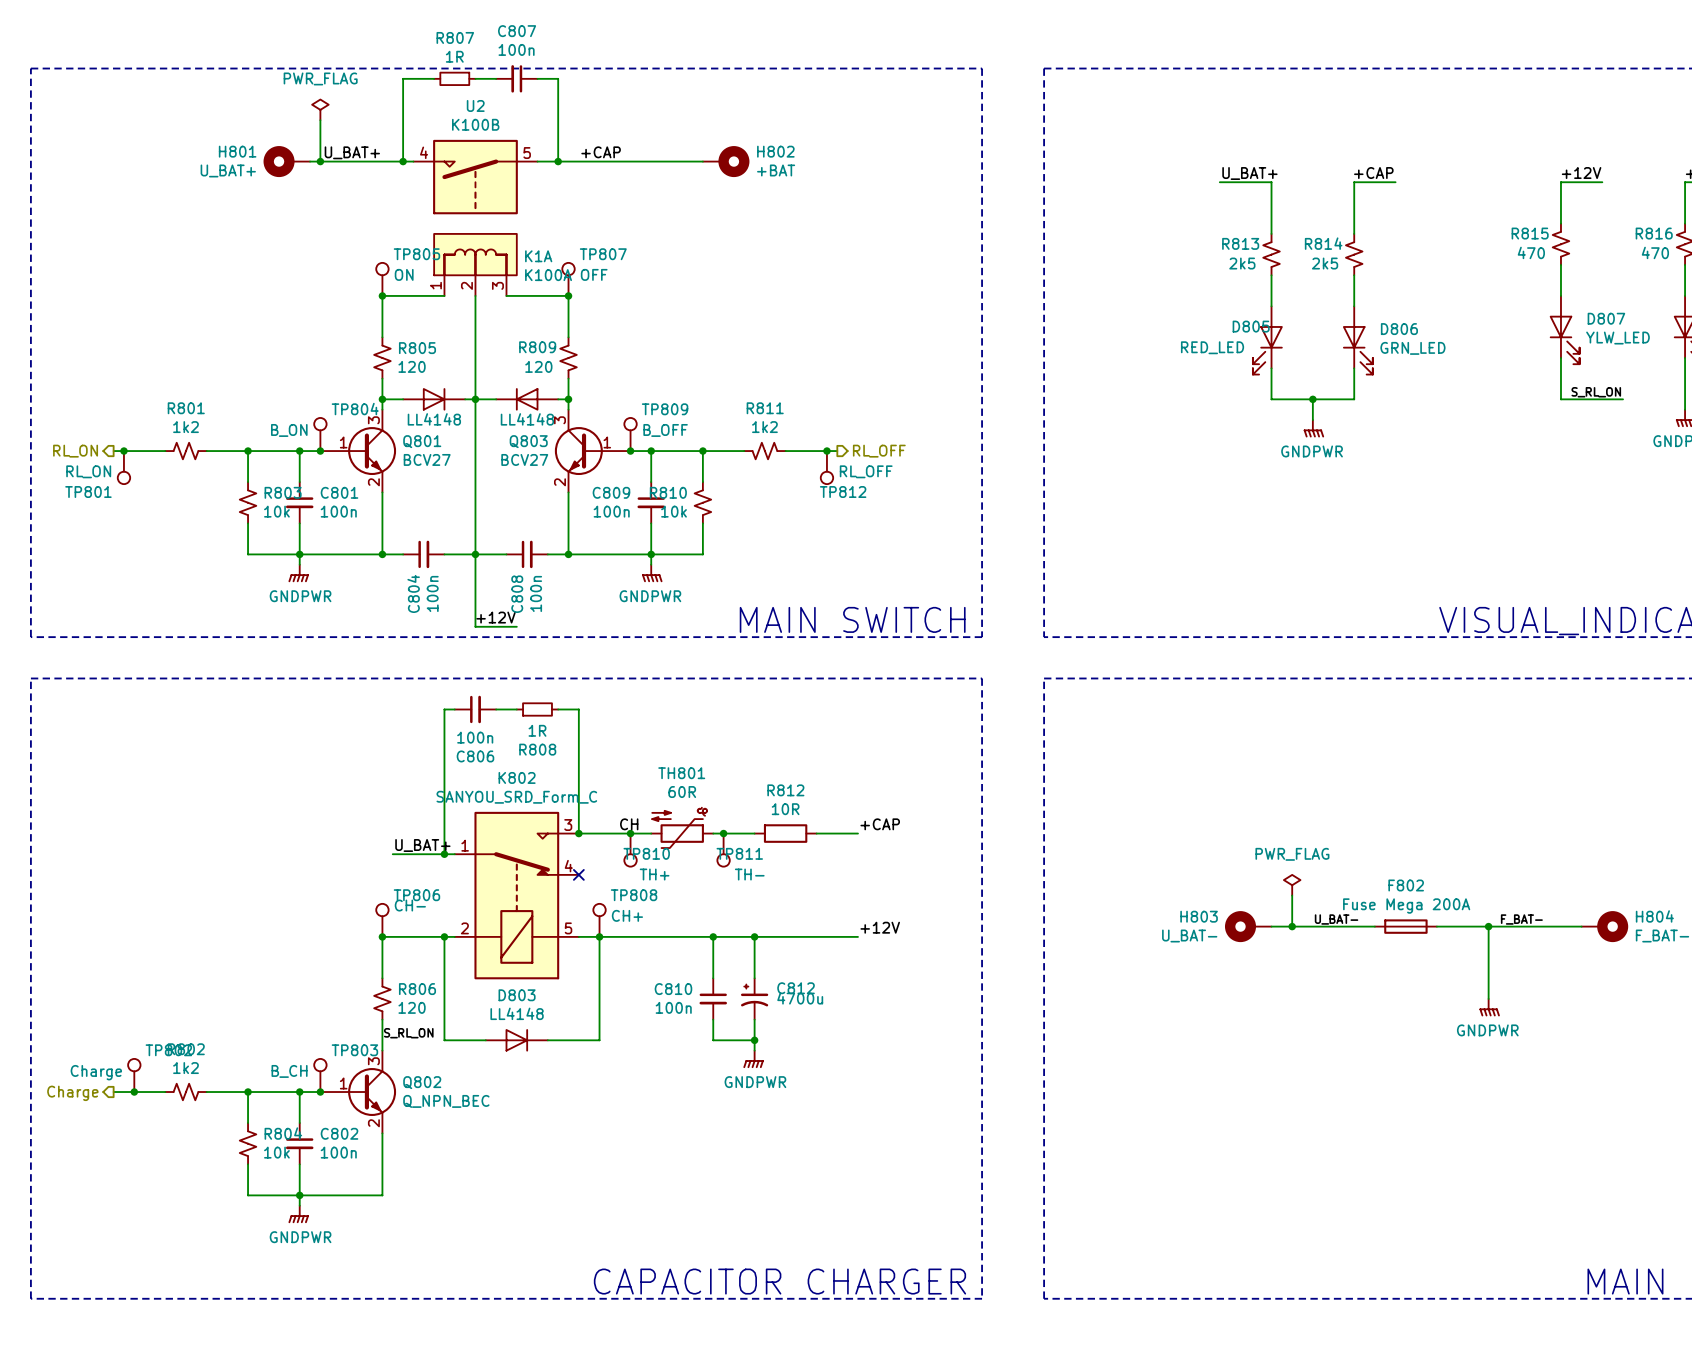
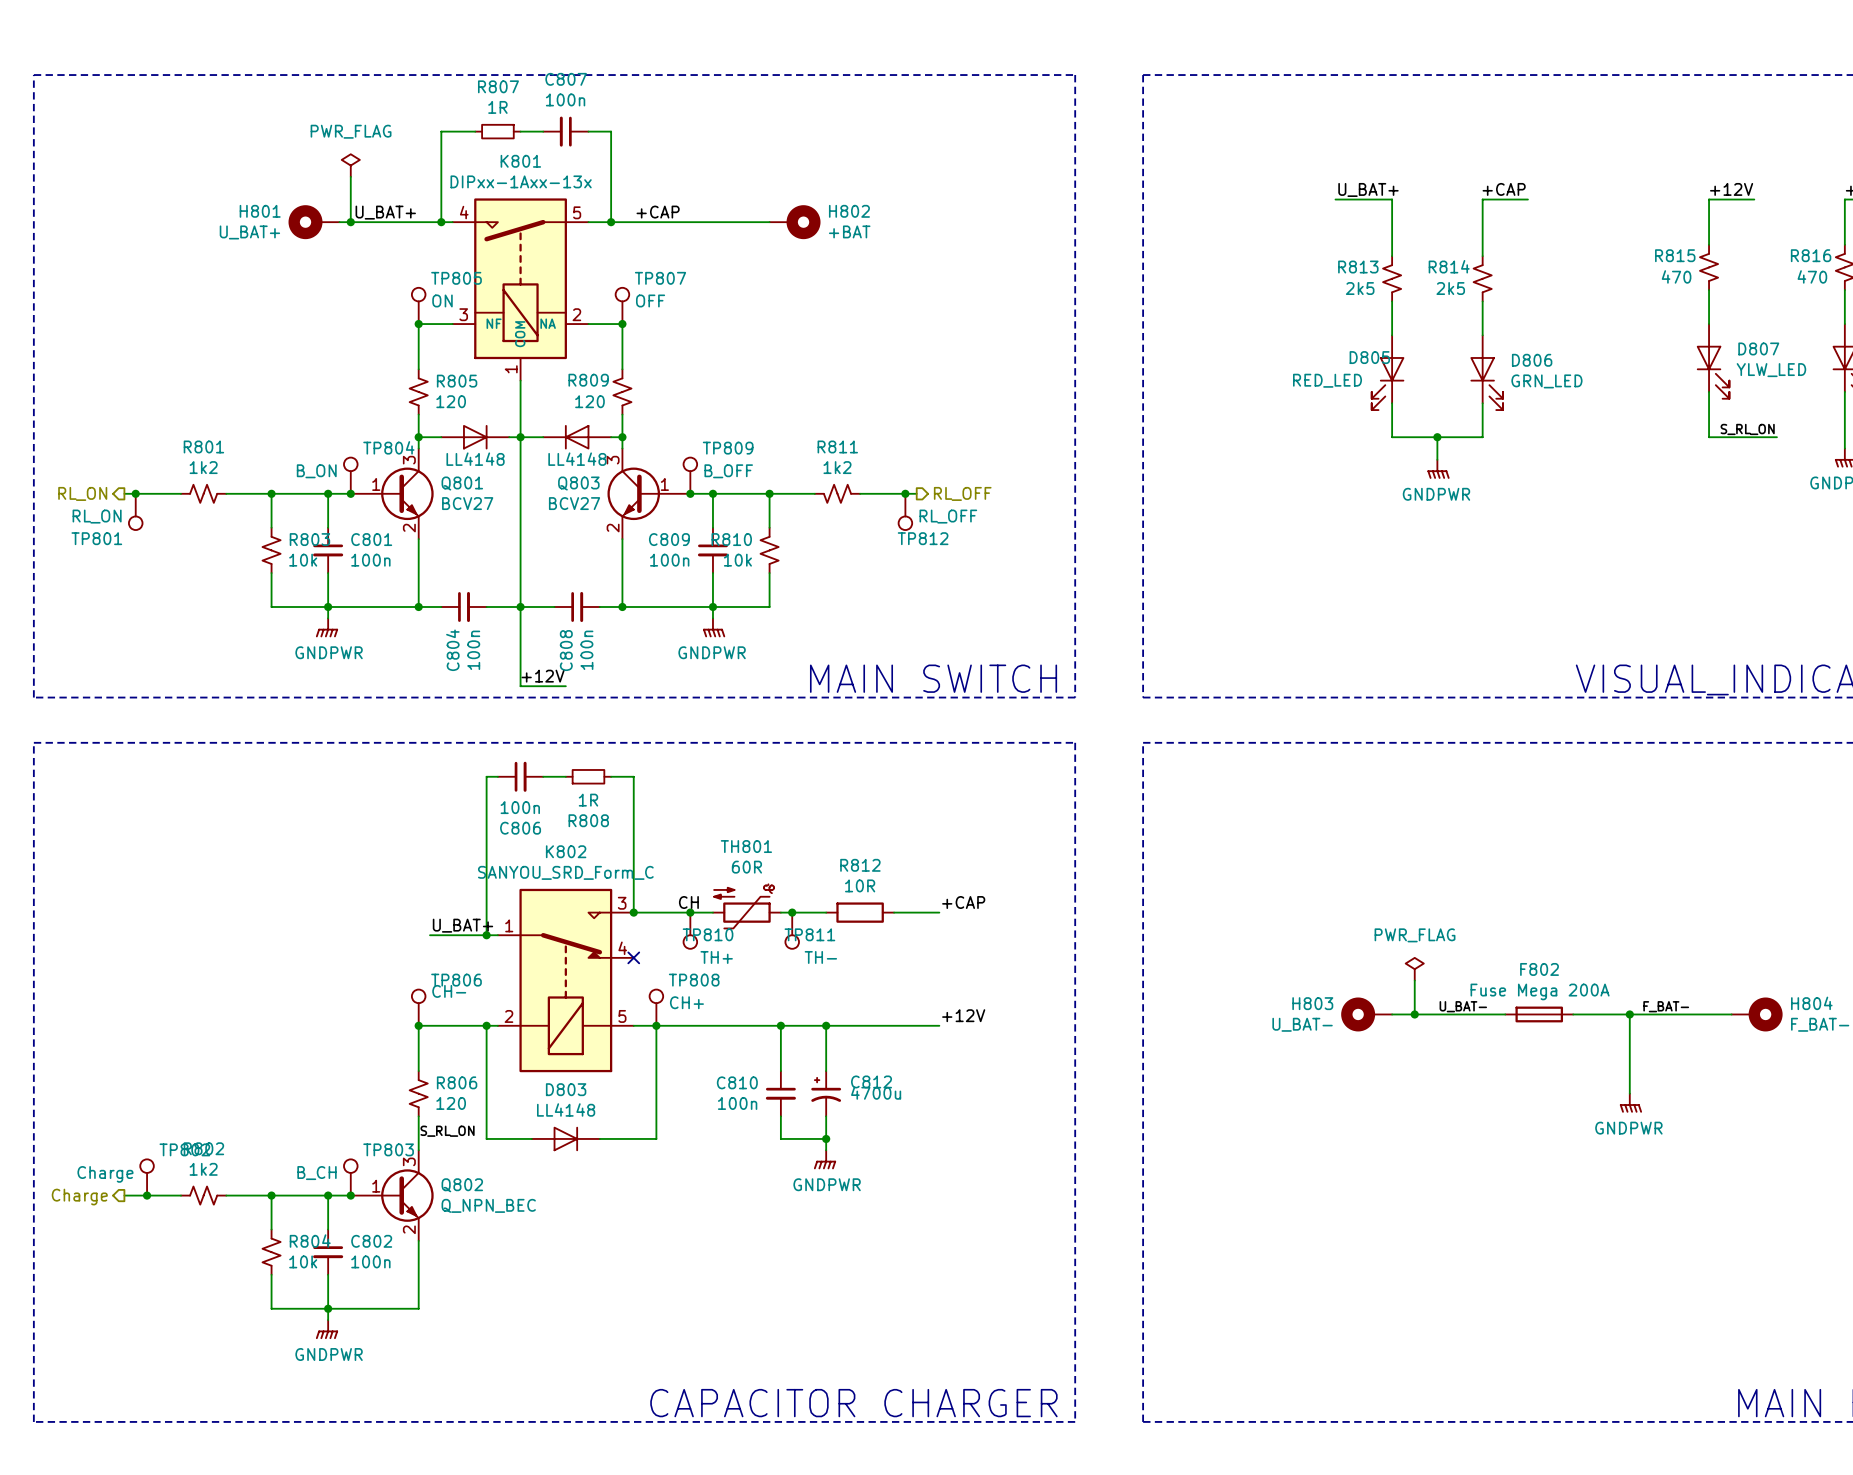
wire: (434, 78) (403, 78) (403, 120) -> (475, 131) (441, 131)
R807 position: (454, 78) -> (497, 131)
wire: (475, 78) (496, 78) -> (520, 131) (543, 131)
C807 position: (516, 78) -> (565, 131)
wire: (537, 78) (558, 78) (558, 120) -> (588, 131) (611, 131)
power symbol position: PWR_FLAG (320, 109) -> PWR_FLAG (350, 165)
wire: (320, 120) (320, 161) -> (350, 222) (350, 176)
label position: U_BAT+ (352, 152) -> U_BAT+ (385, 212)
label position: +CAP (601, 152) -> +CAP (658, 212)
H801 position: (286, 161) -> (314, 222)
wire: (310, 161) (413, 161) -> (339, 222) (452, 222)
junction position: (320, 161) -> (350, 222)
wire: none -> (441, 176) (441, 222)
junction position: (403, 161) -> (441, 222)
wire: (537, 161) (702, 161) -> (588, 222) (769, 222)
wire: none -> (611, 176) (611, 222)
junction position: (558, 161) -> (611, 222)
H802 position: (726, 161) -> (795, 222)
U2: K100B (475, 177) -> none
K1A: K100A (475, 264) -> none
K801: none -> DIPxx-1Axx-13x (520, 289)

